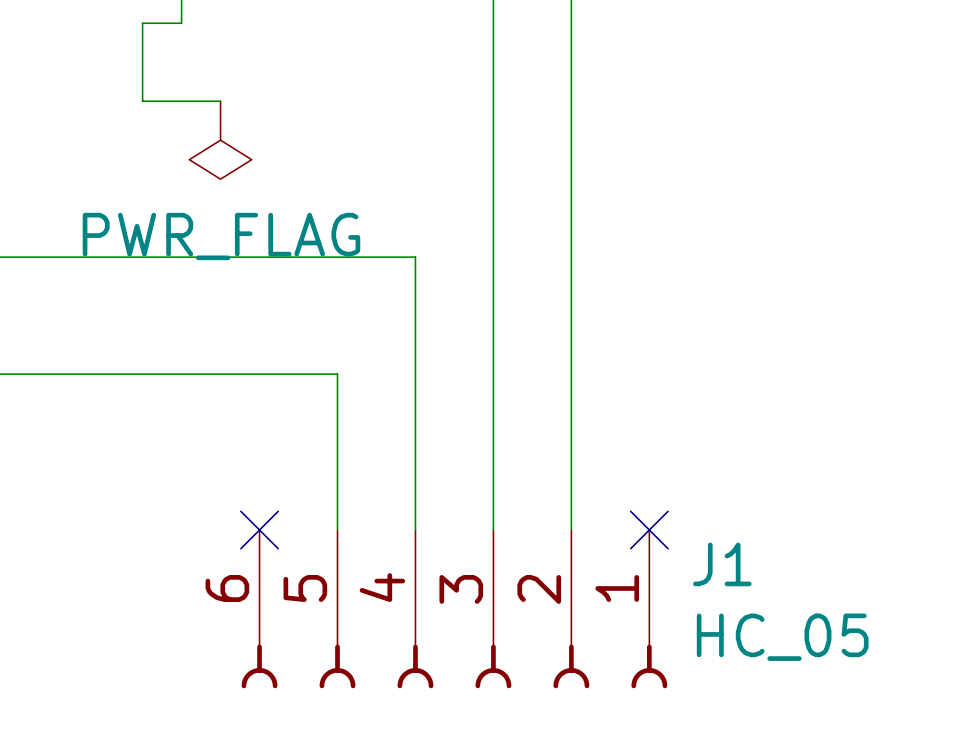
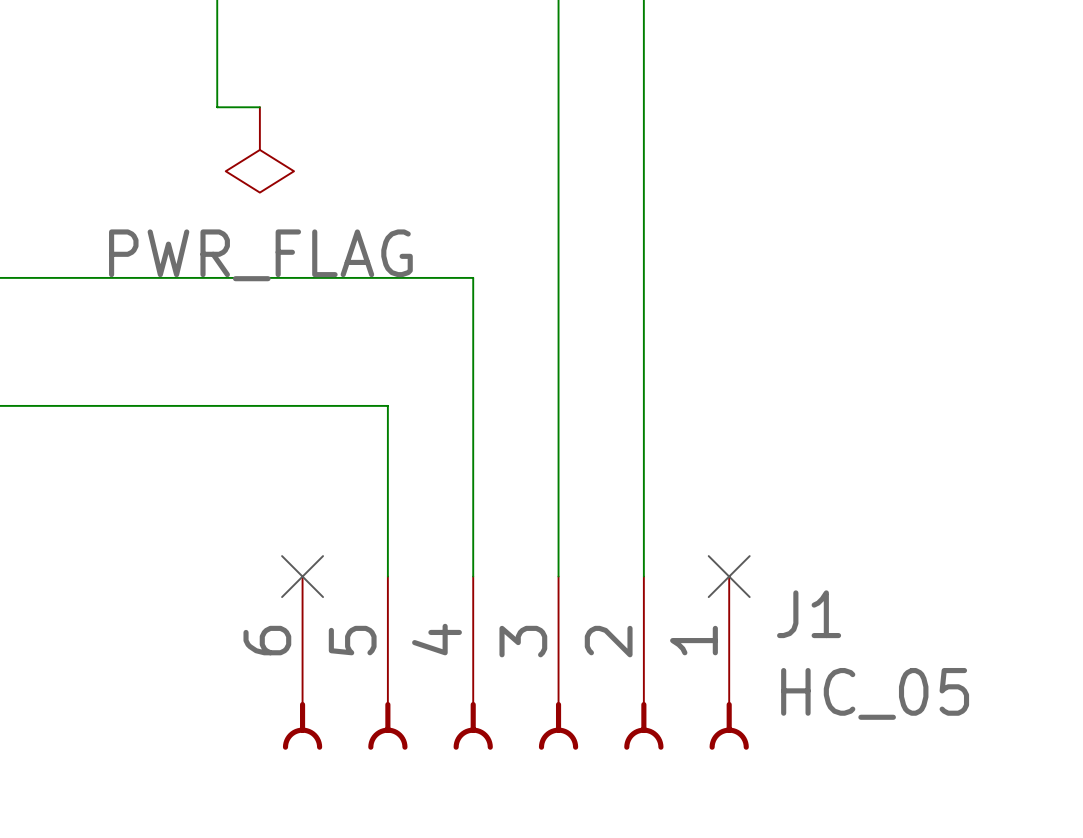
wire: (181, 23) (142, 23) (142, 101) (181, 101) -> (217, 21) (217, 107)

